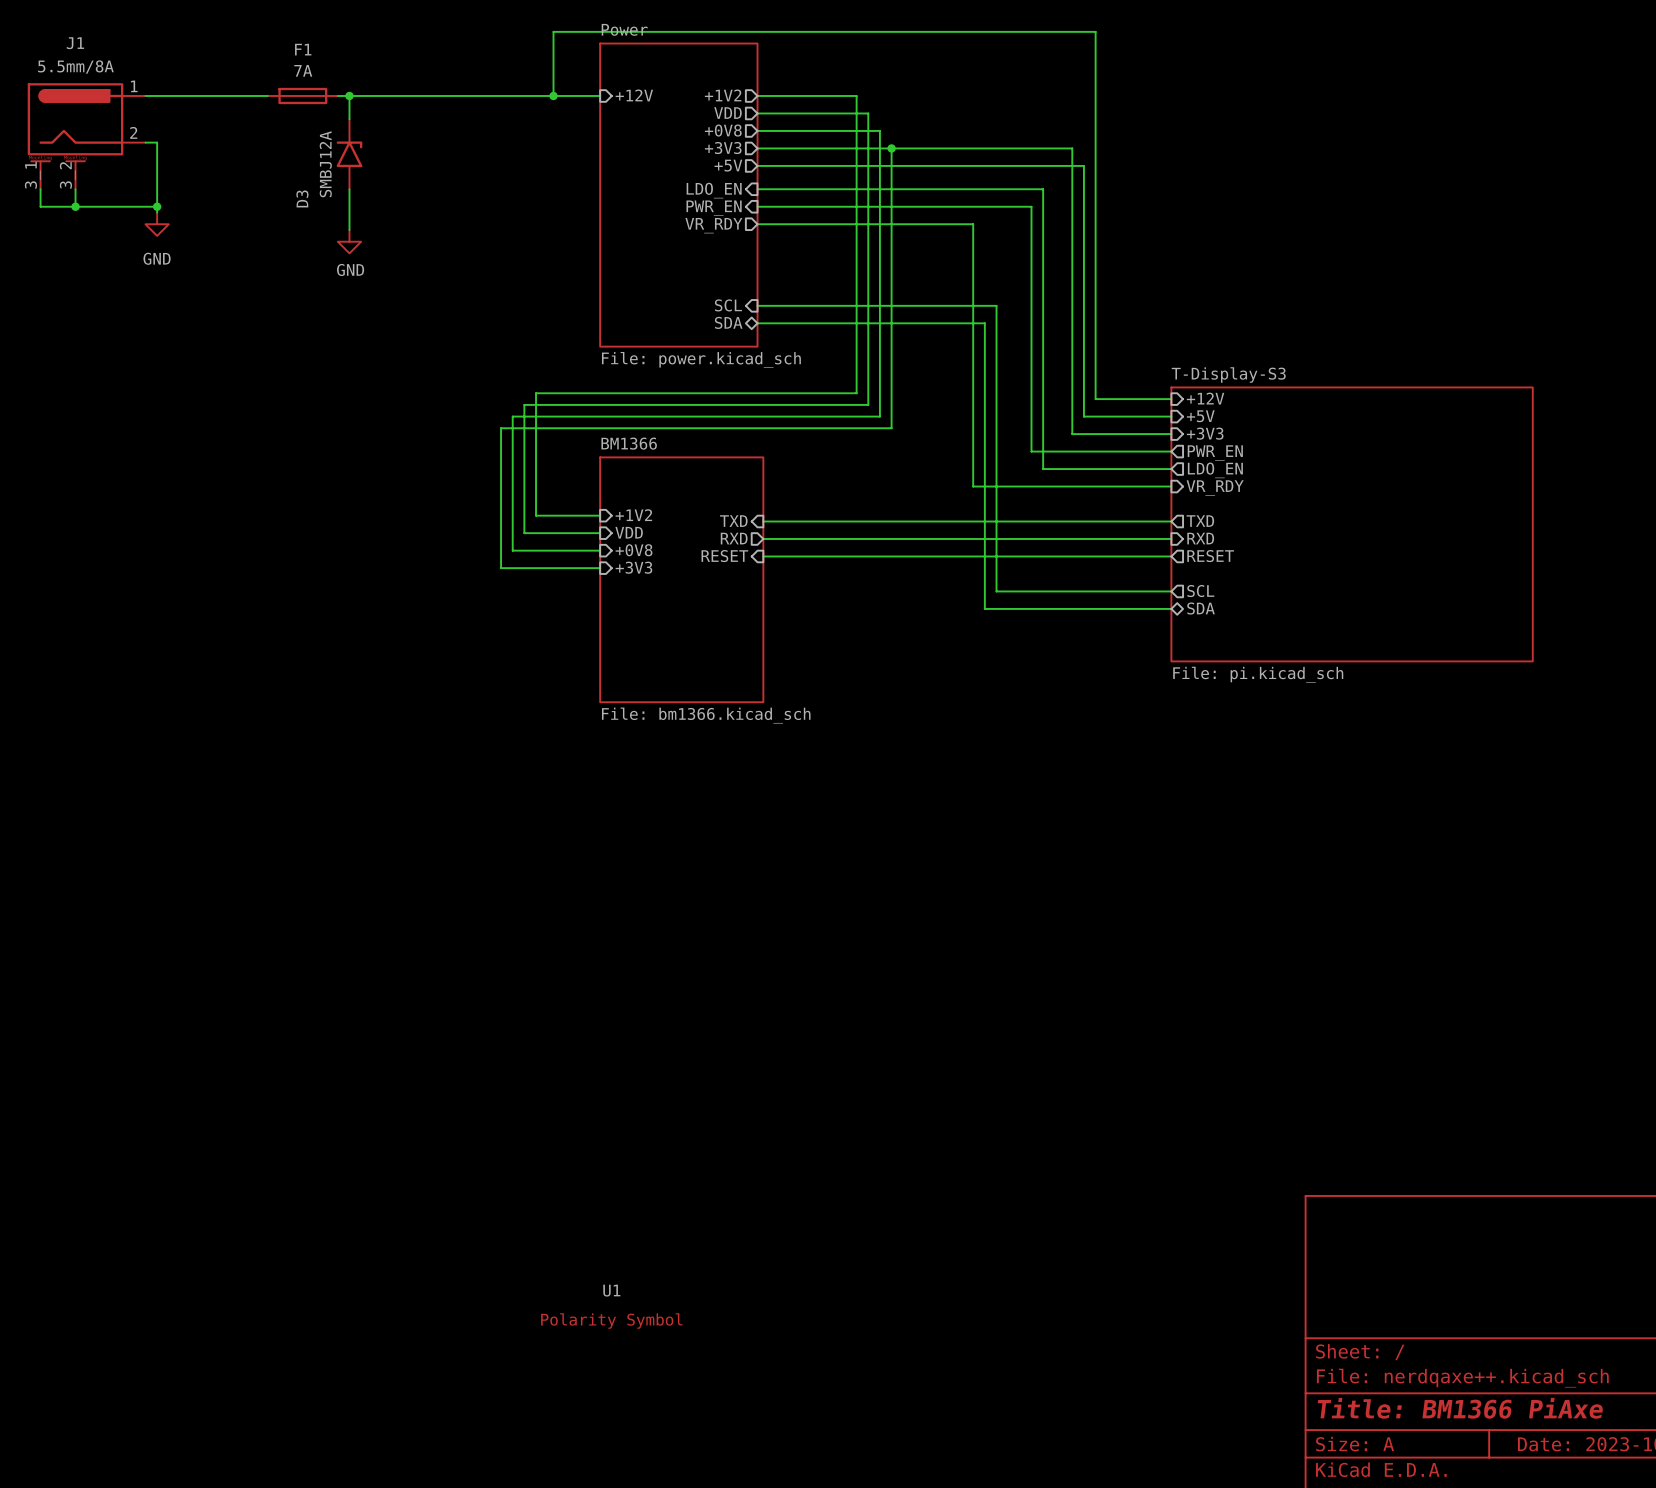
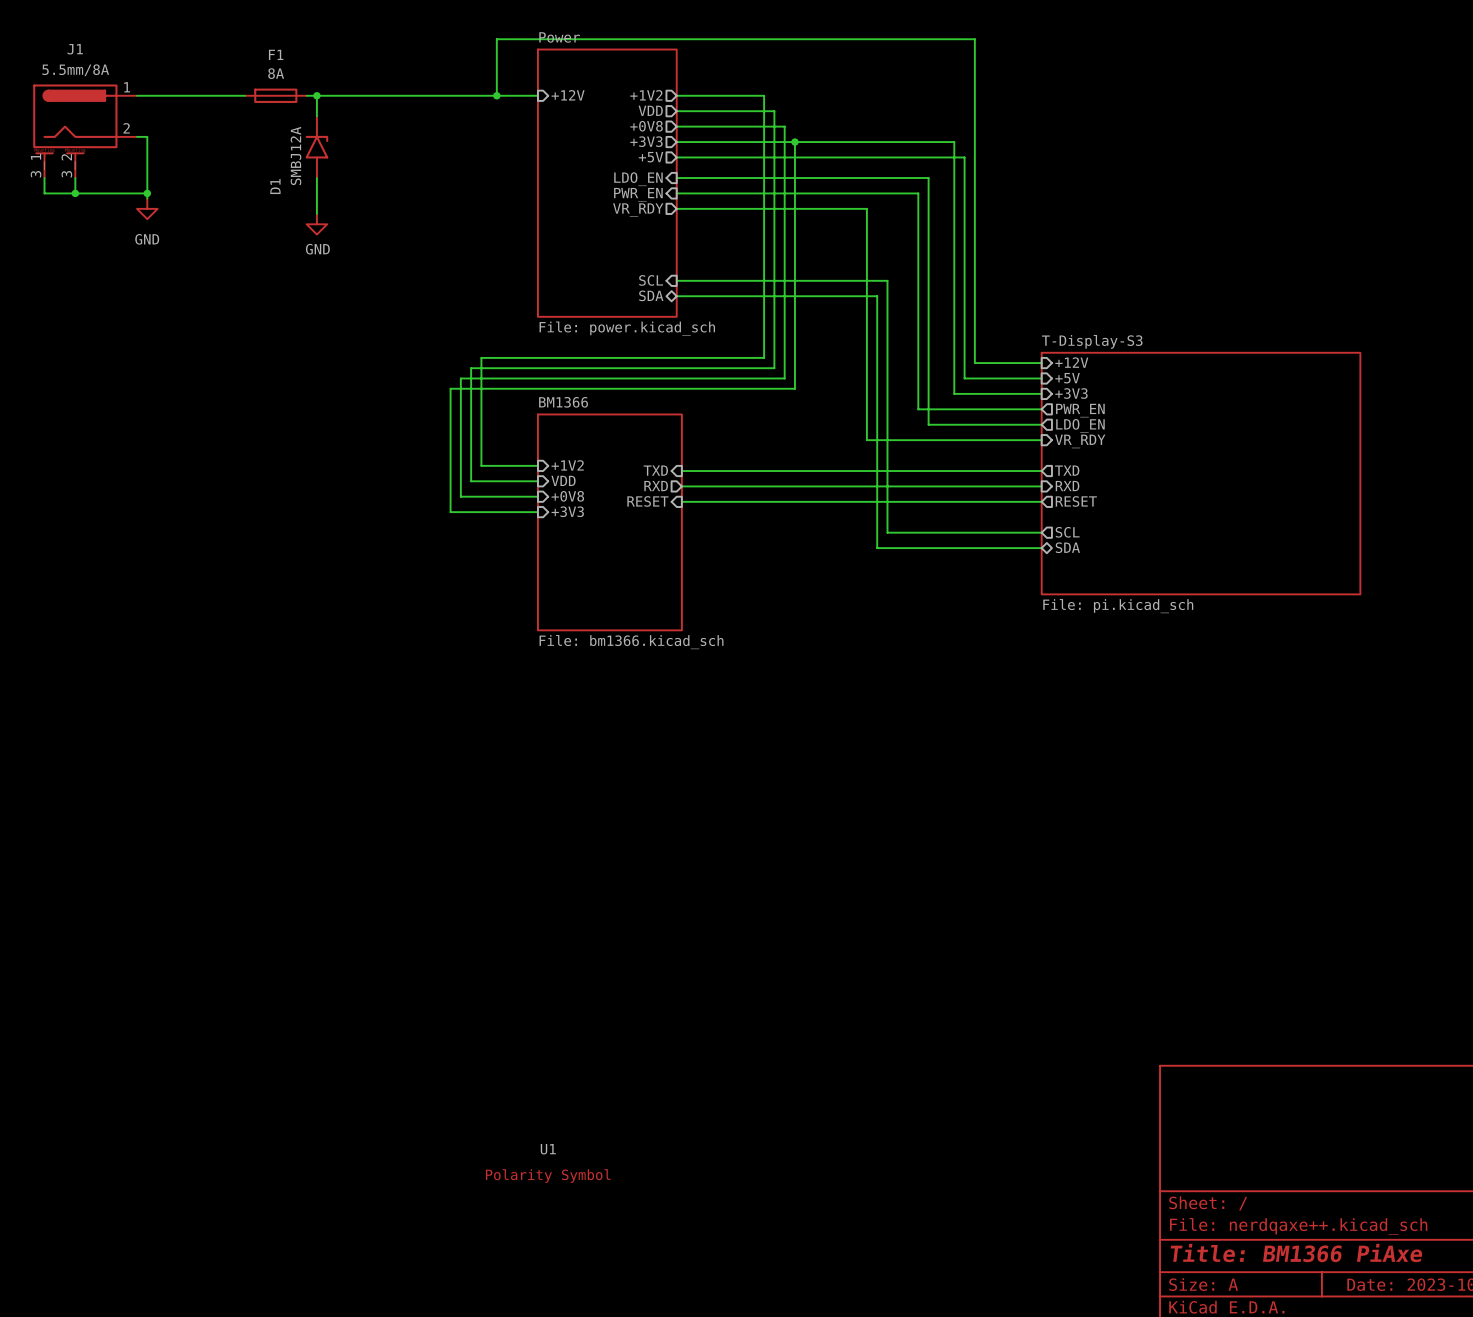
F1 value: 7A (303, 70) -> 8A (276, 73)
D3 name: D3 (302, 198) -> D1 (275, 186)

